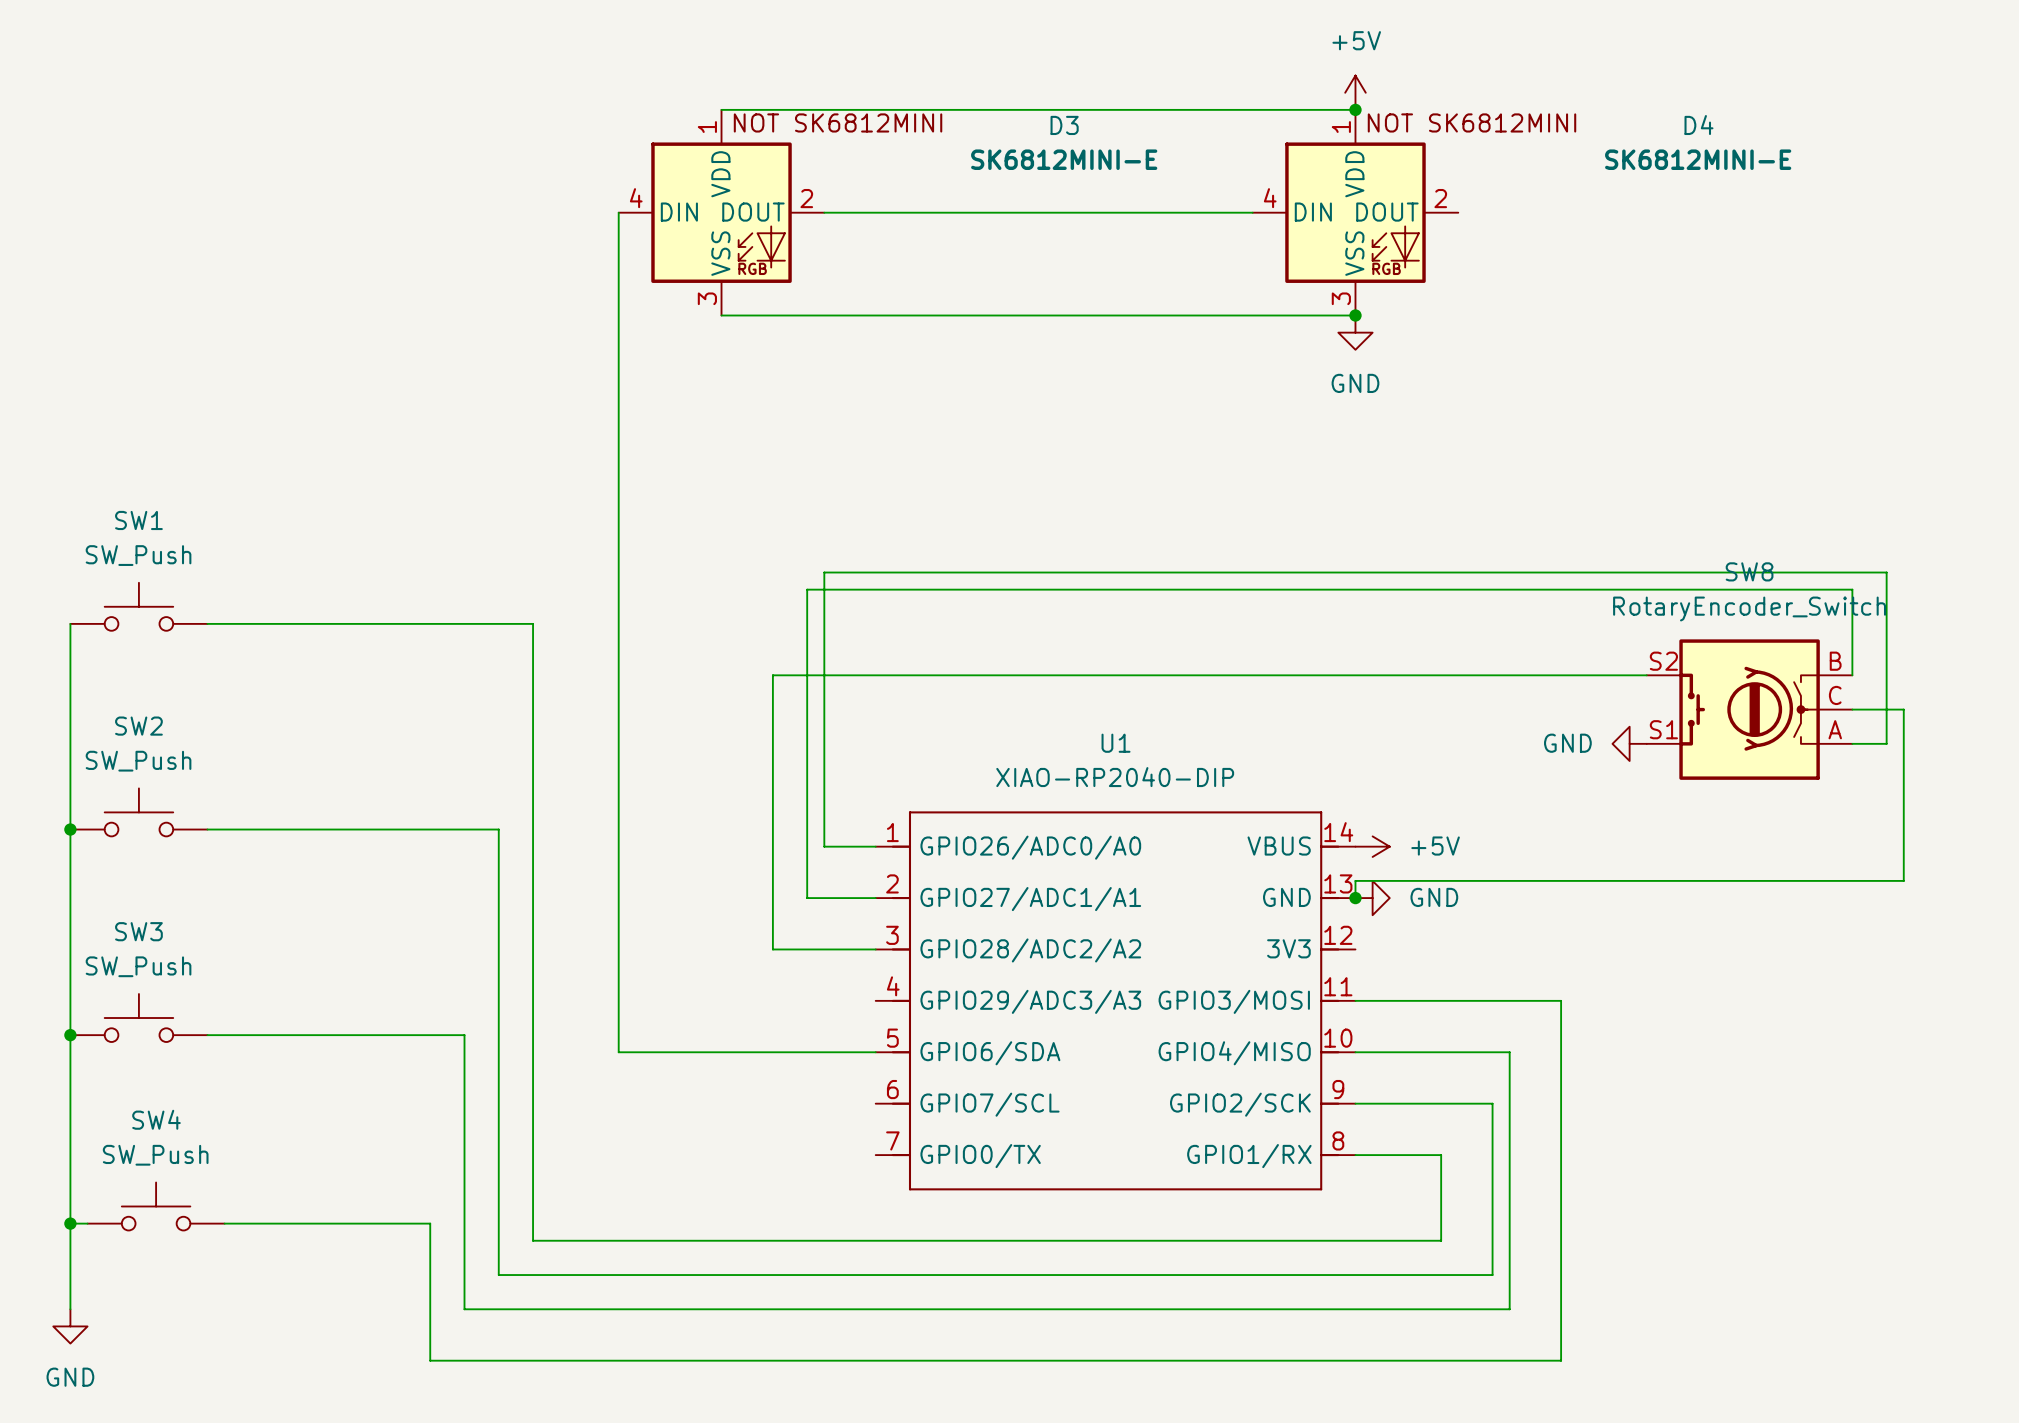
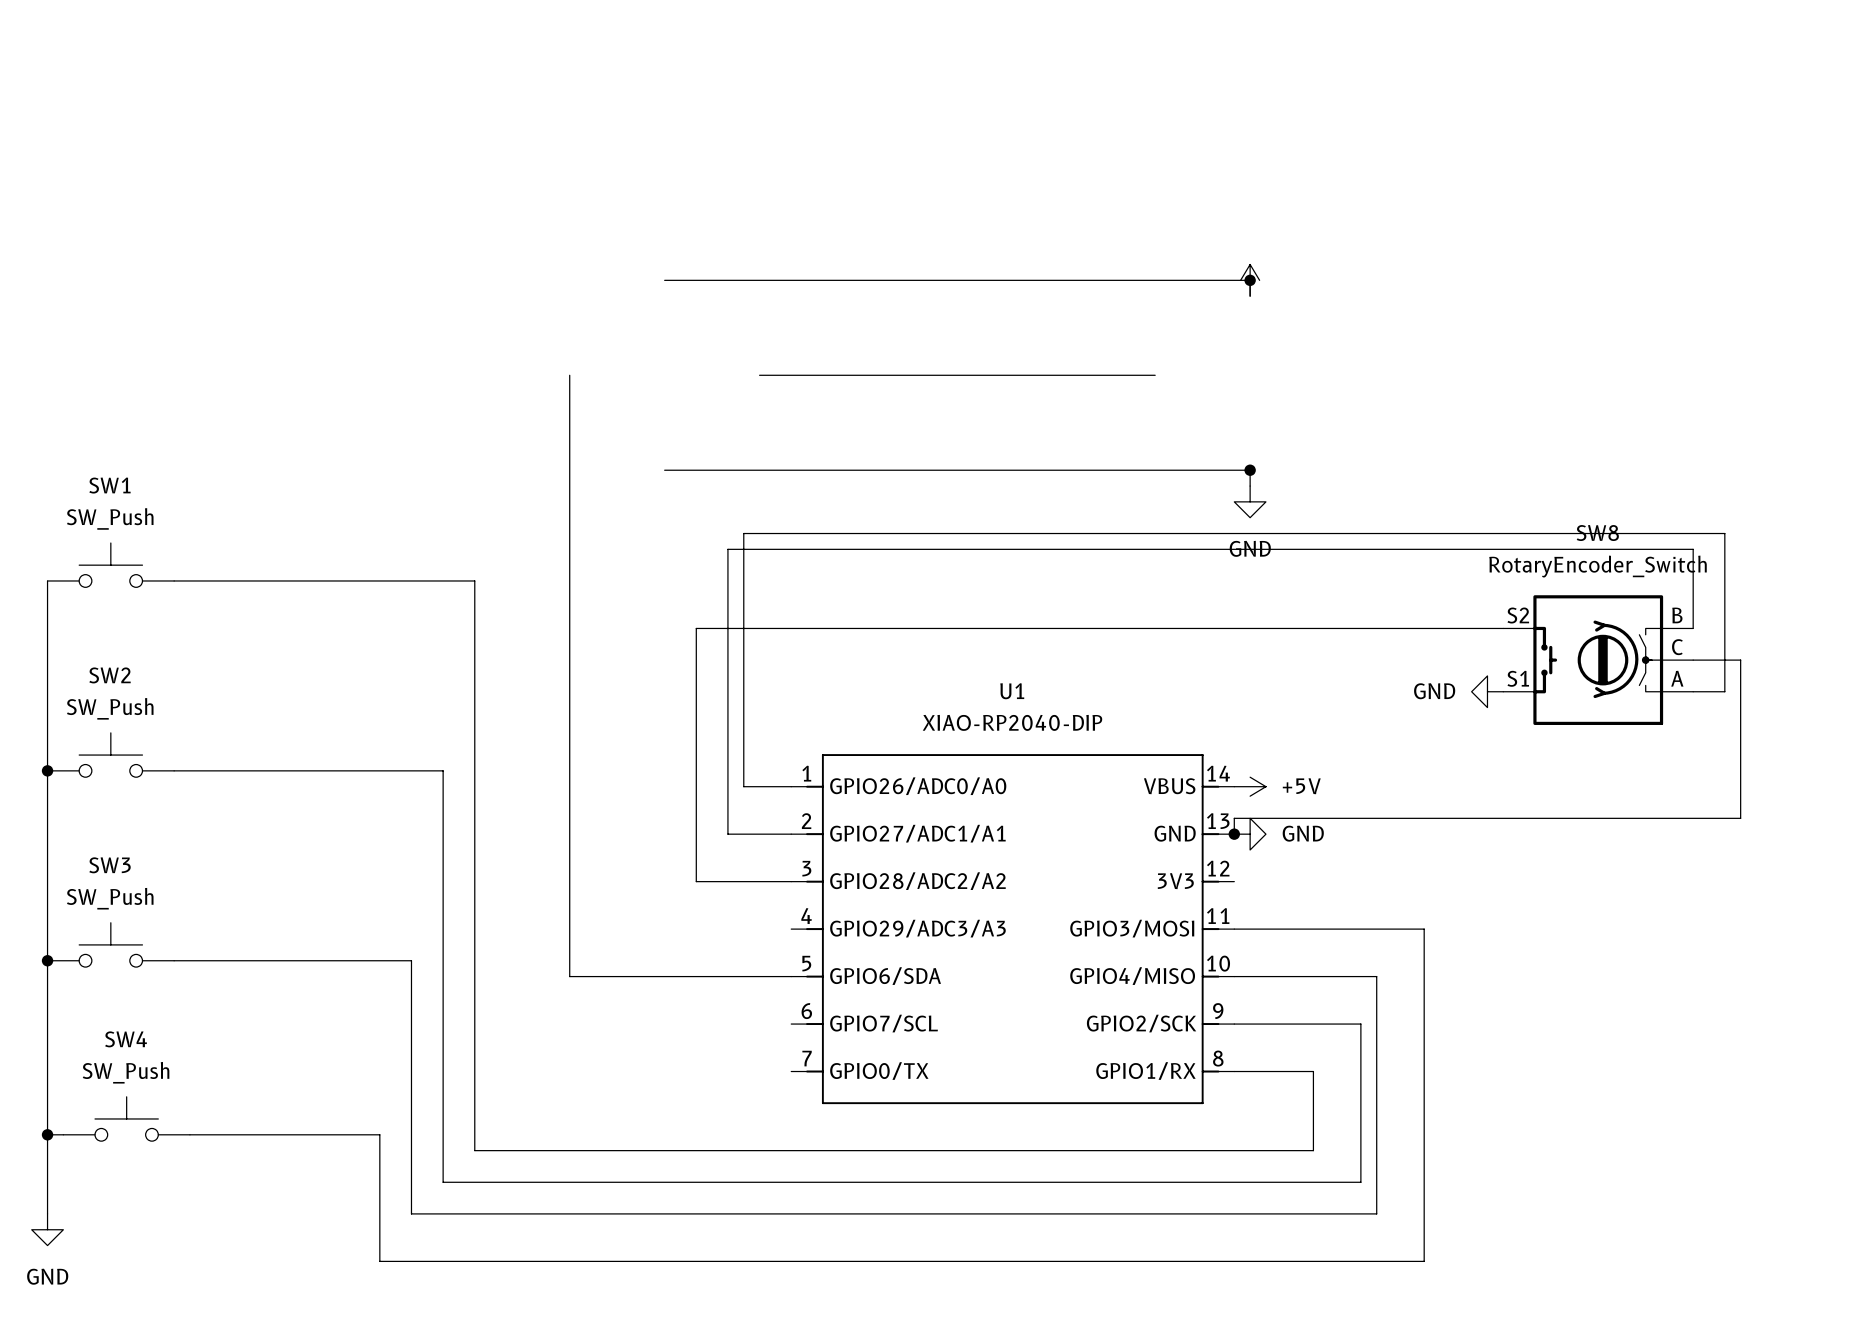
power symbol: +5V (1355, 92) -> none
wire: (721, 109) (1355, 109) -> none
junction: (1355, 109) -> none
wire: (618, 212) (618, 1052) (635, 1052) -> (569, 375) (569, 976)
D3: SK6812MINI-E (721, 212) -> none
wire: (824, 212) (1252, 212) -> (759, 375) (1155, 375)
D4: SK6812MINI-E (1355, 212) -> none
wire: none -> (664, 280) (1250, 280) (1250, 296)
power symbol: none -> (1250, 280)
wire: (721, 315) (1355, 315) -> none
junction position: (1355, 315) -> (1250, 280)
power symbol position: GND (1355, 332) -> GND (1250, 501)
wire: none -> (664, 470) (1250, 470) (1250, 486)
junction: none -> (1250, 470)

